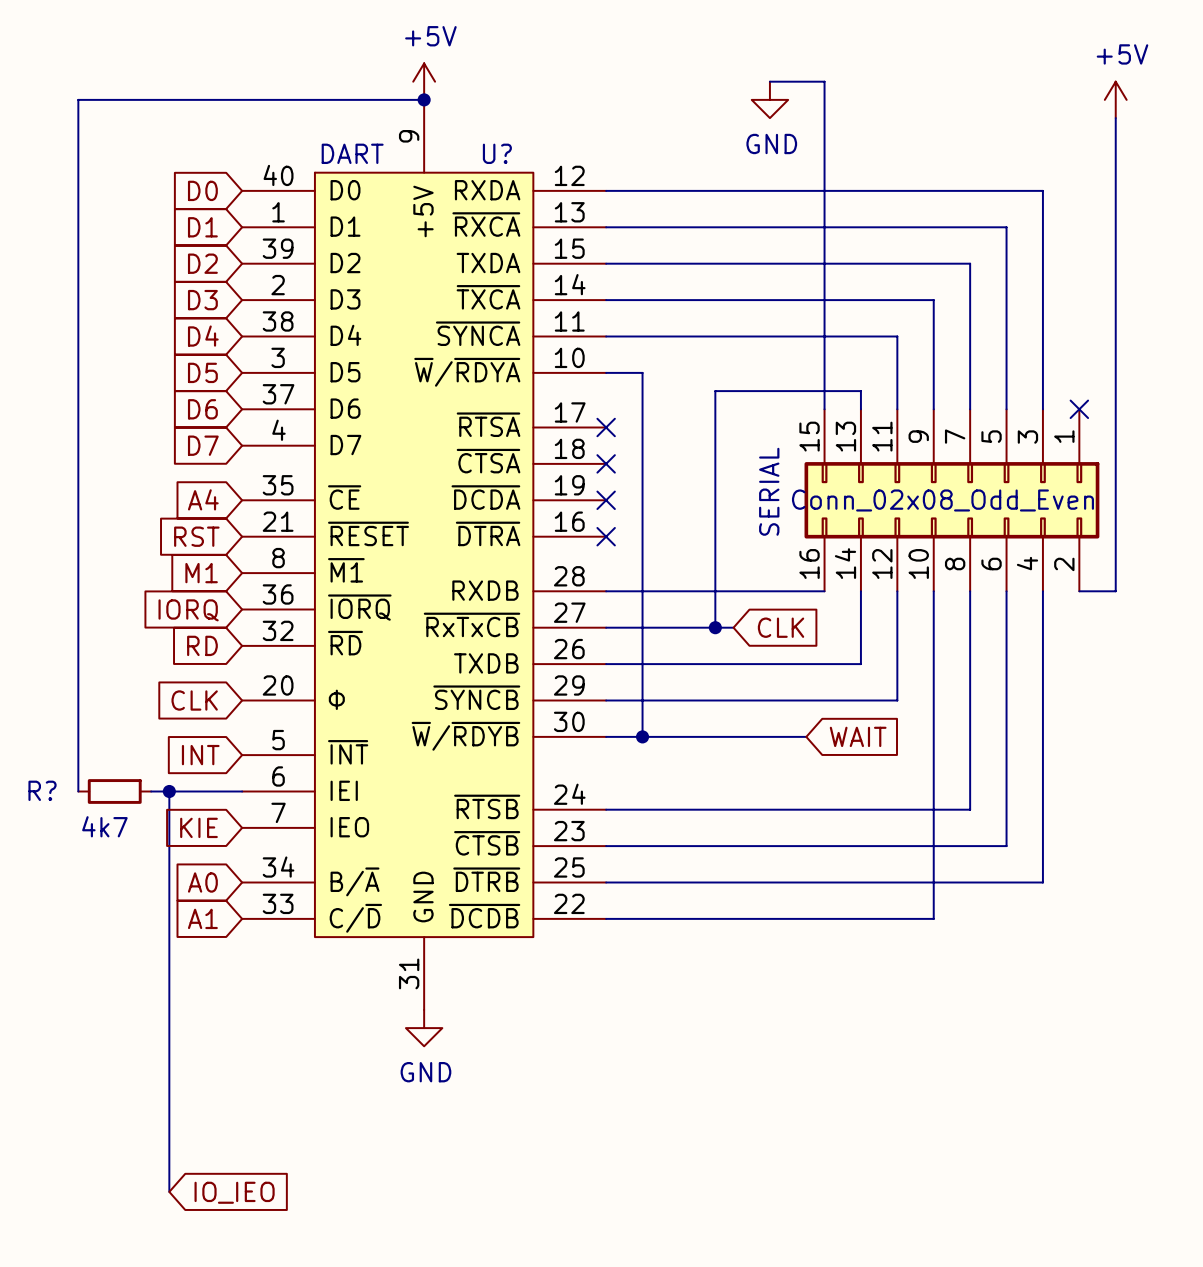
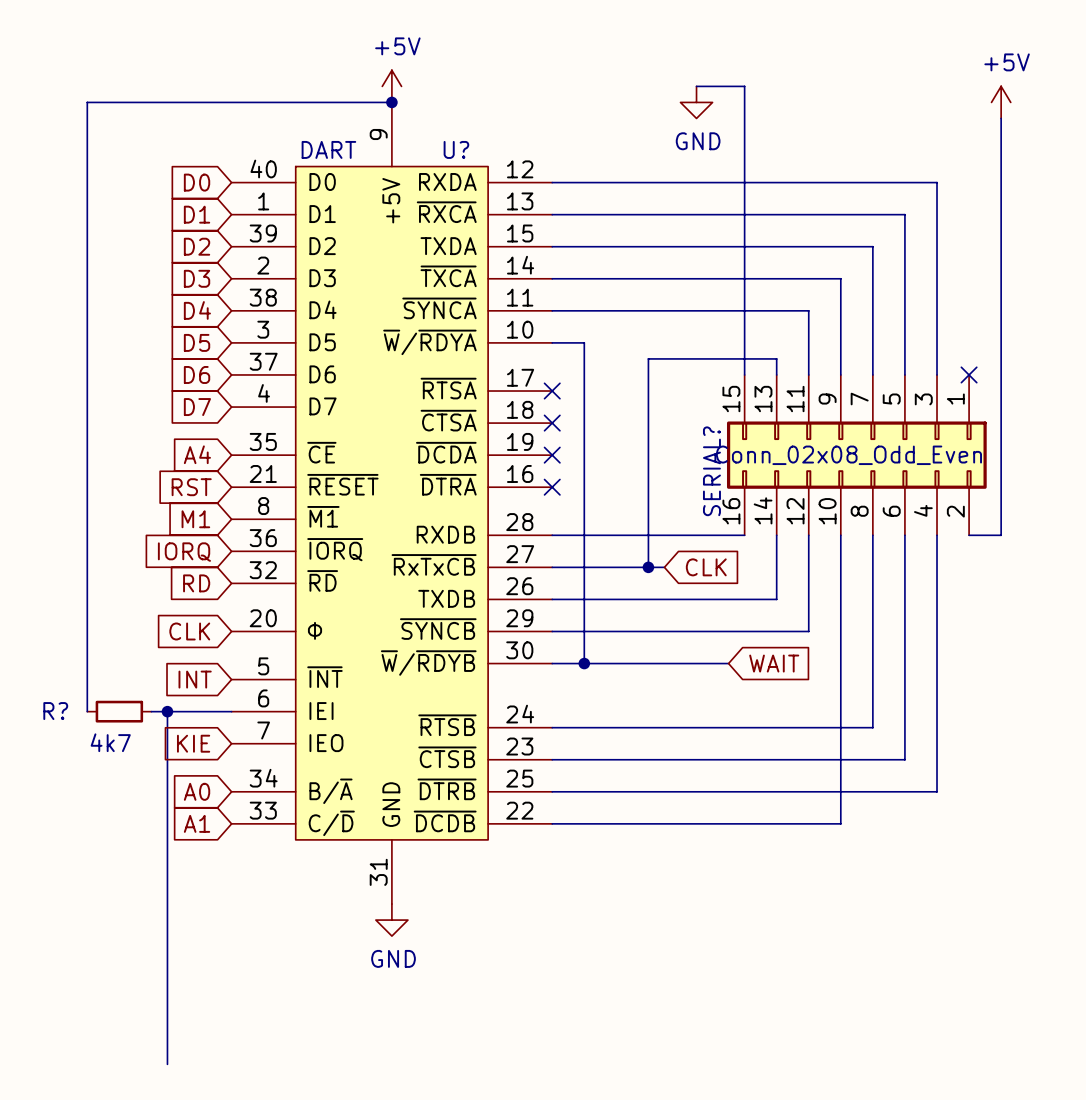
SERIAL name: SERIAL (769, 491) -> SERIAL? (711, 471)
global label: IO_IEO (234, 1192) -> none

